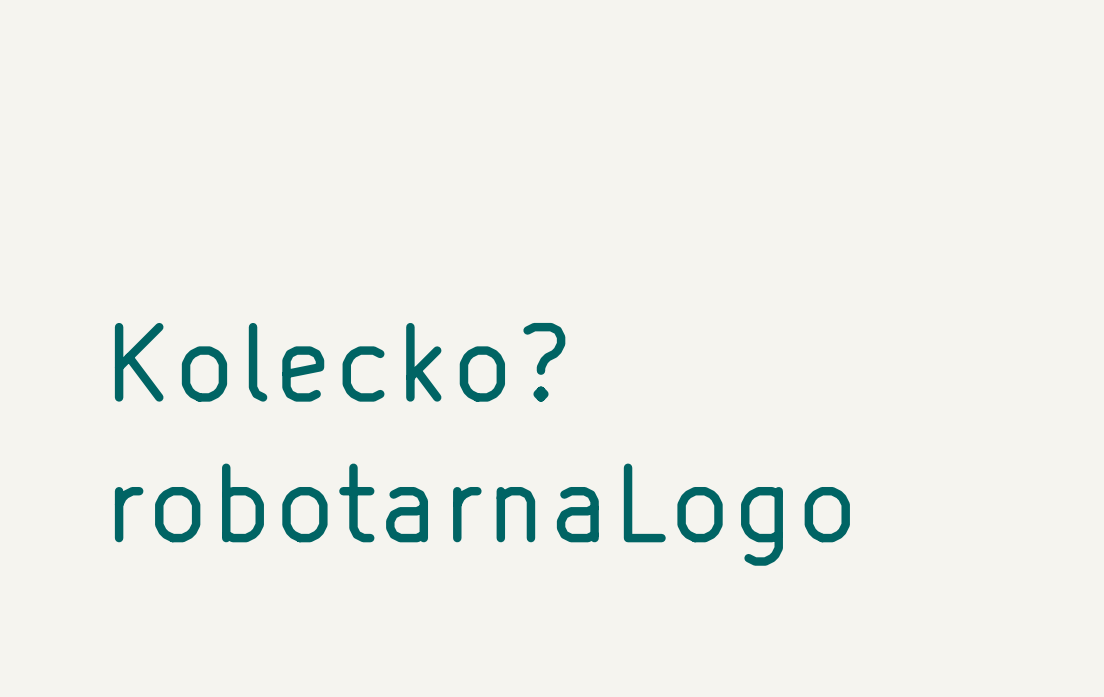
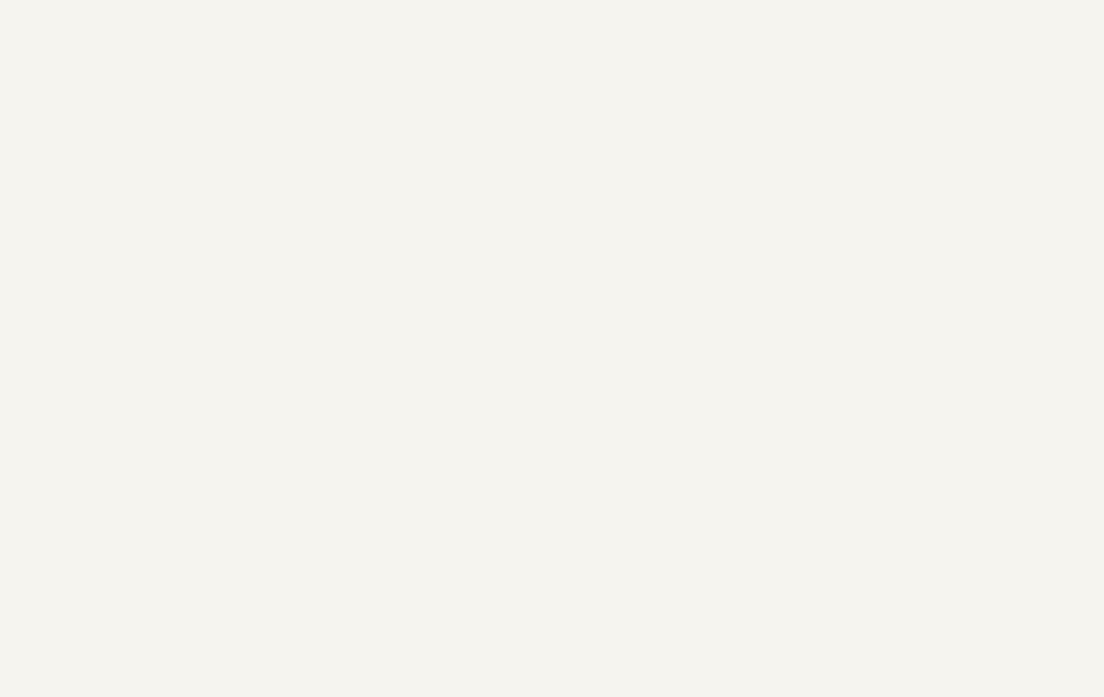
Kolecko?: robotarnaLogo (482, 444) -> none

